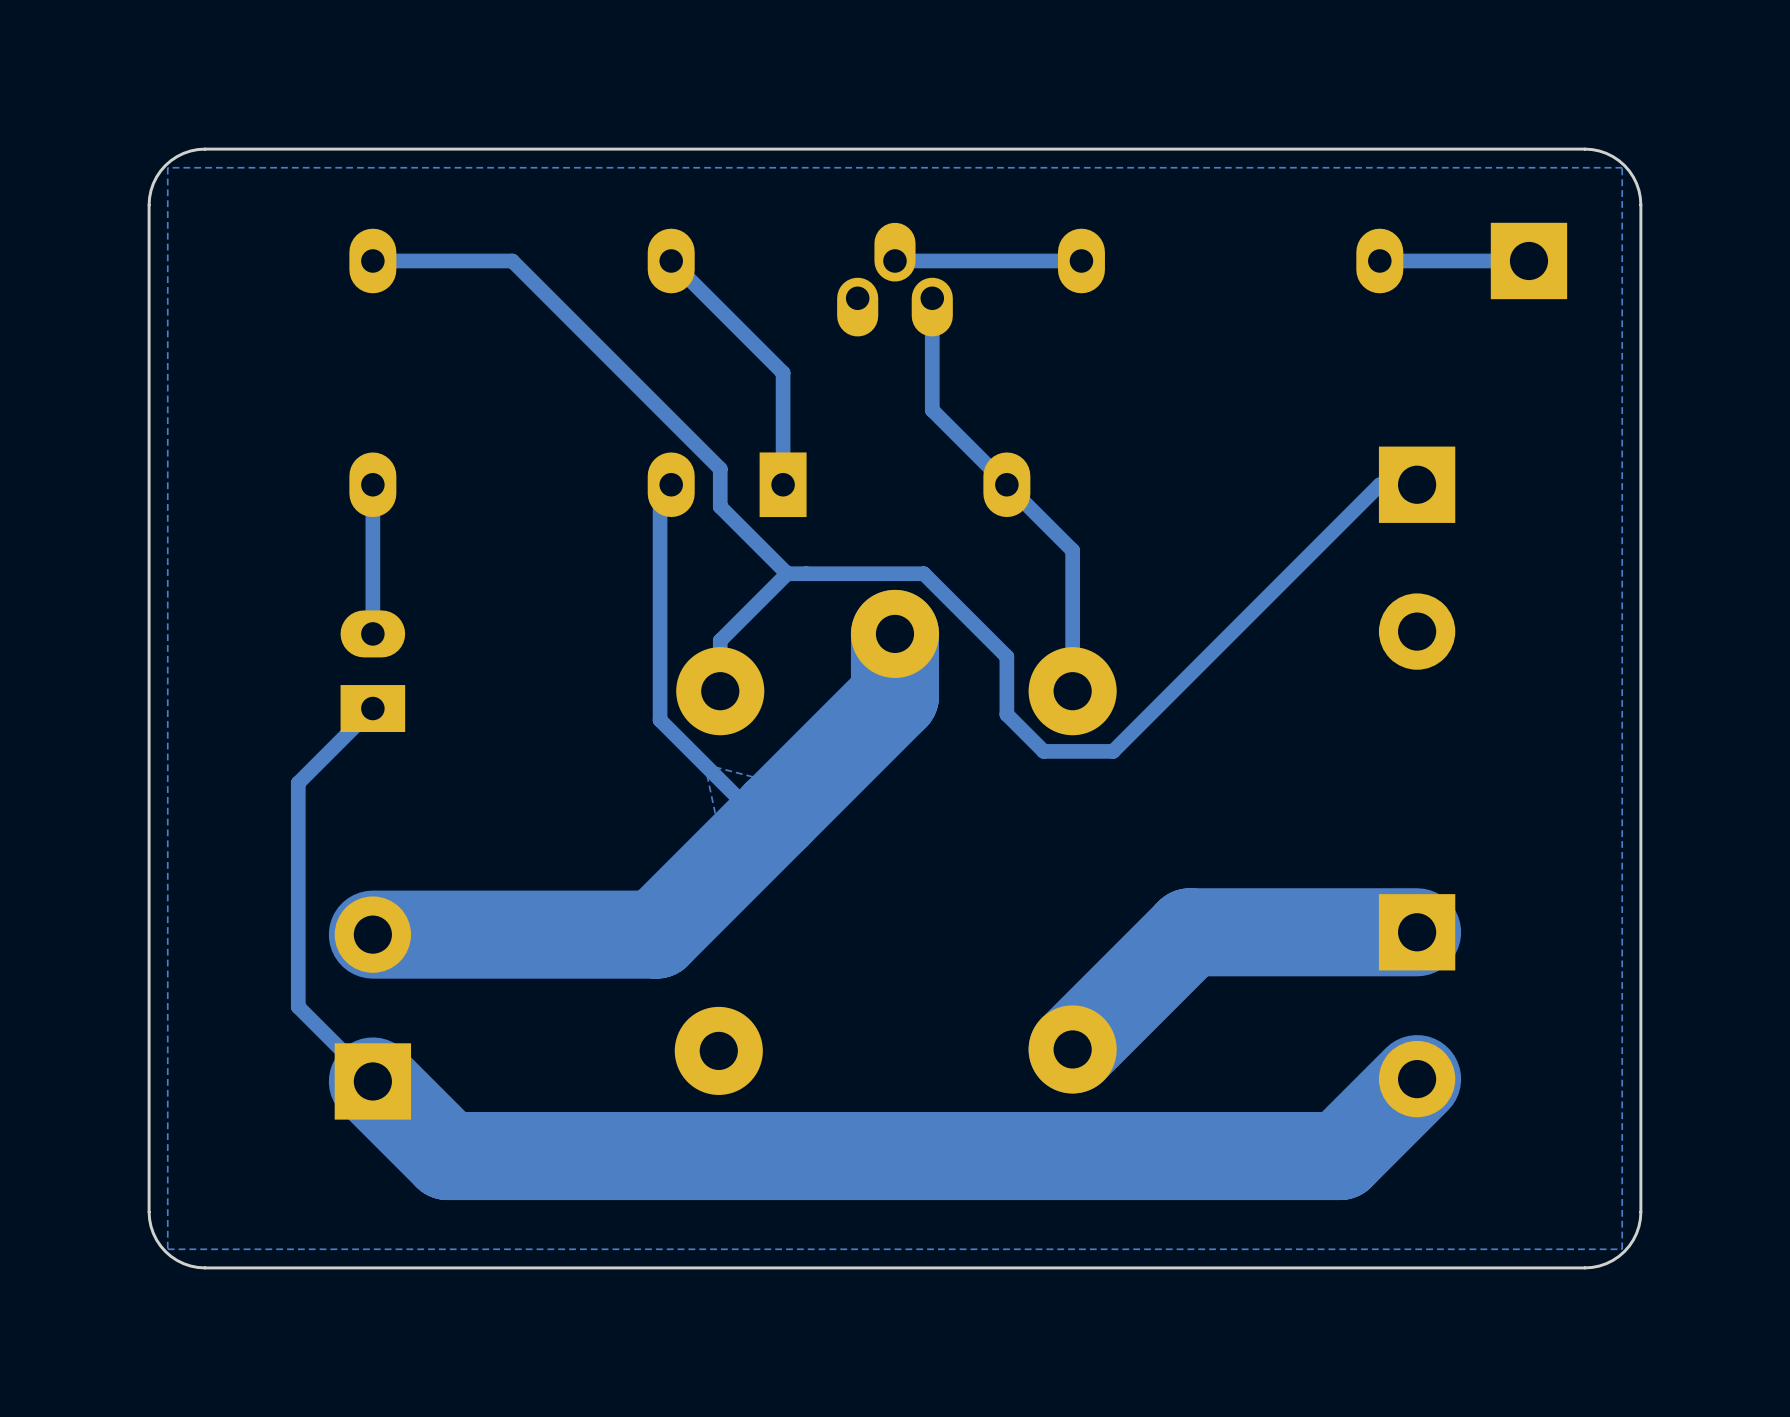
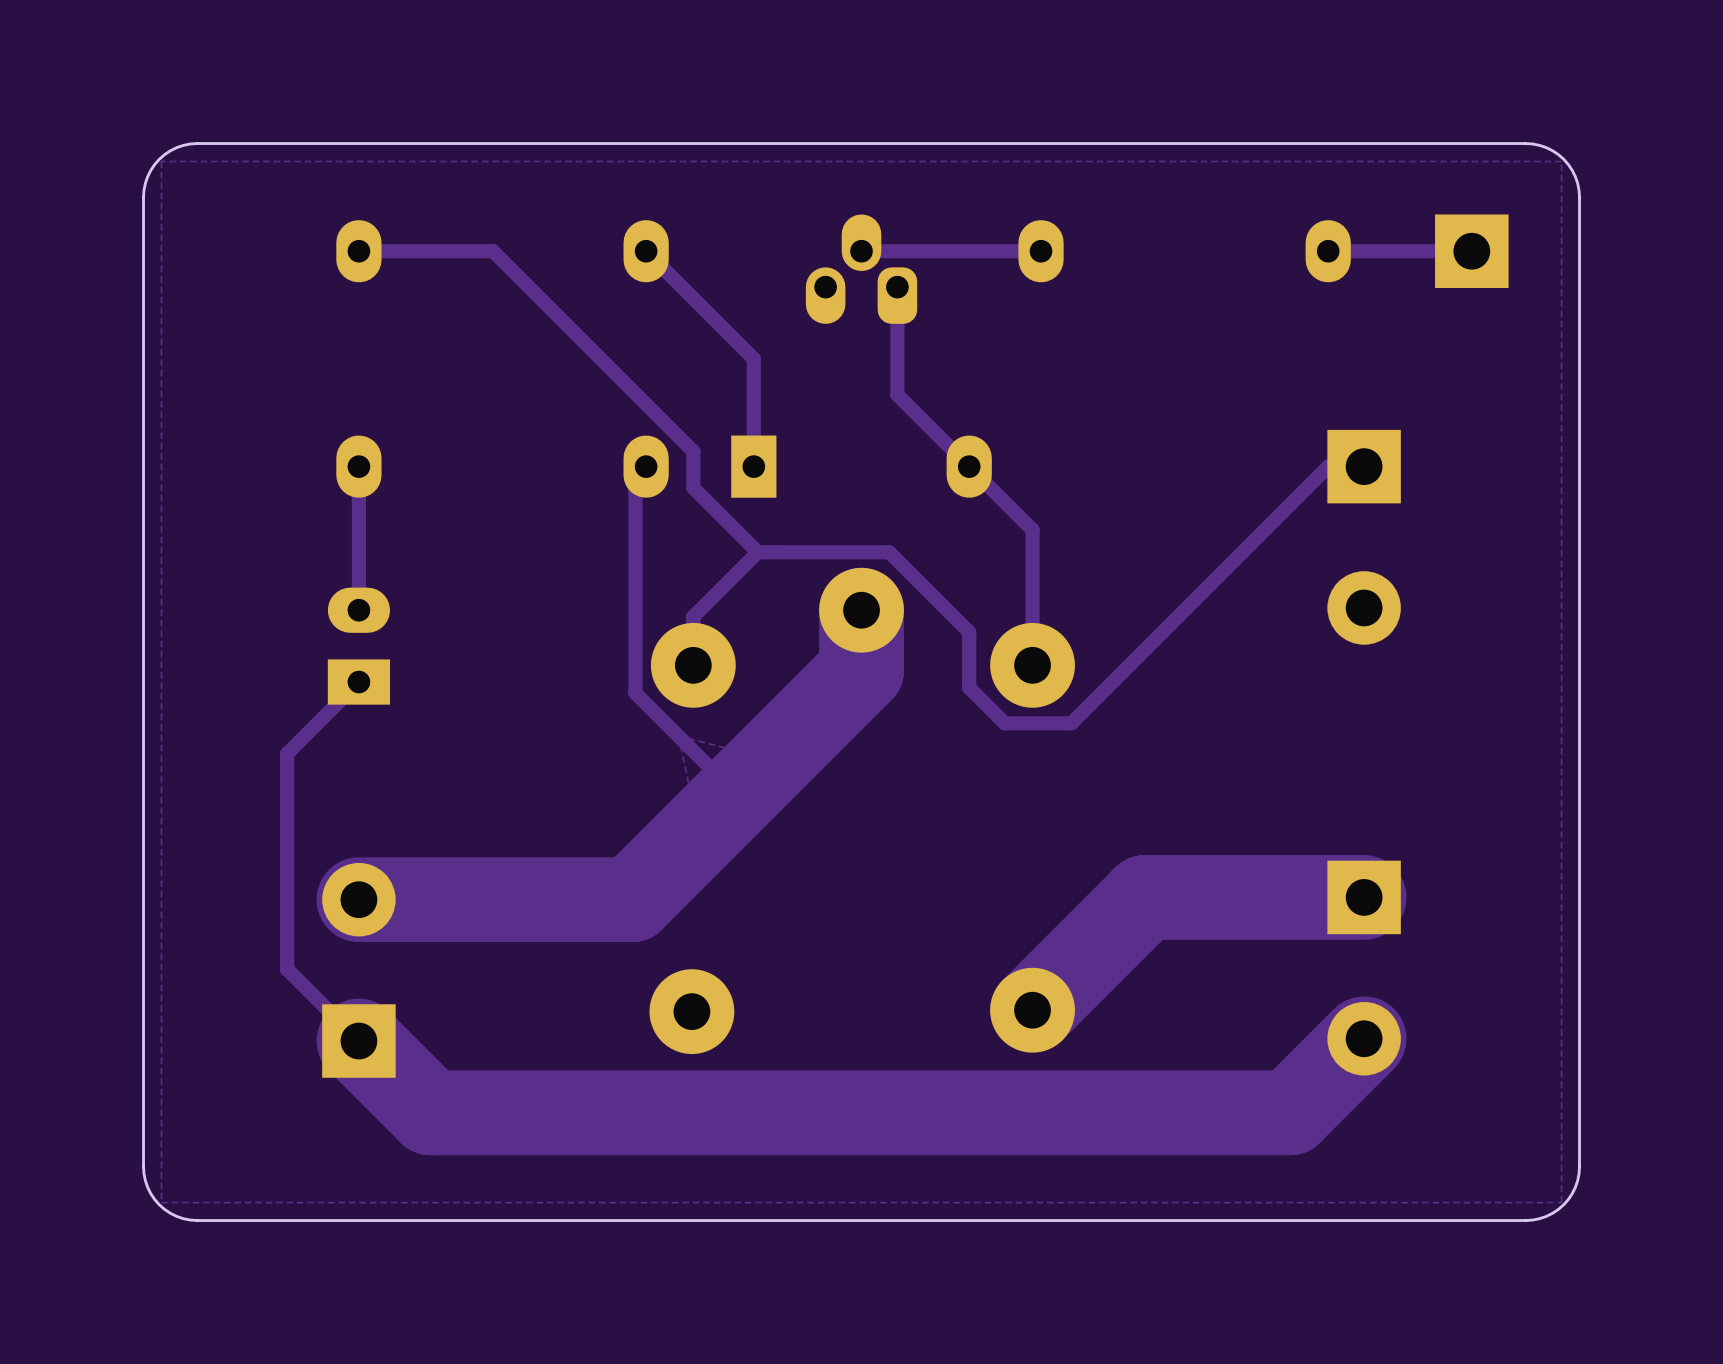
part footprint: [837, 222, 953, 337] -> [805, 214, 918, 324]

